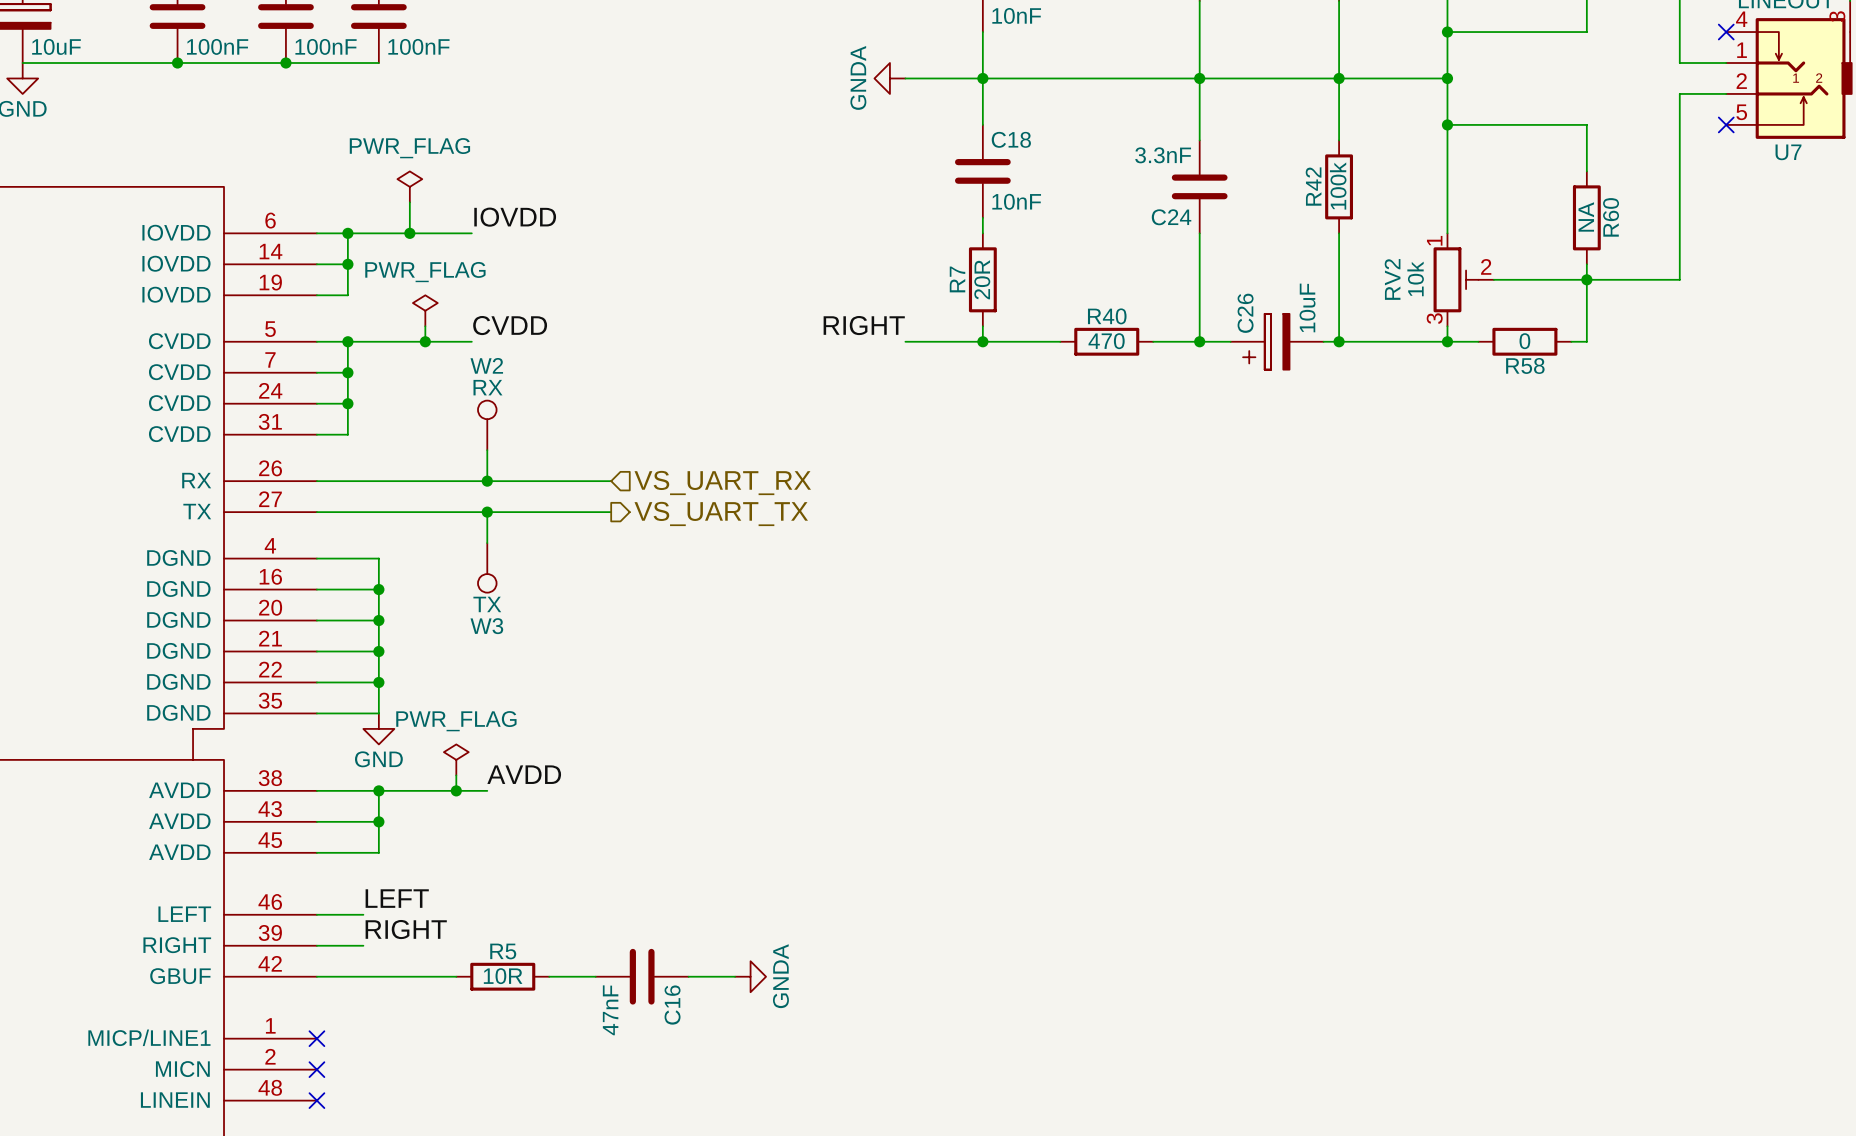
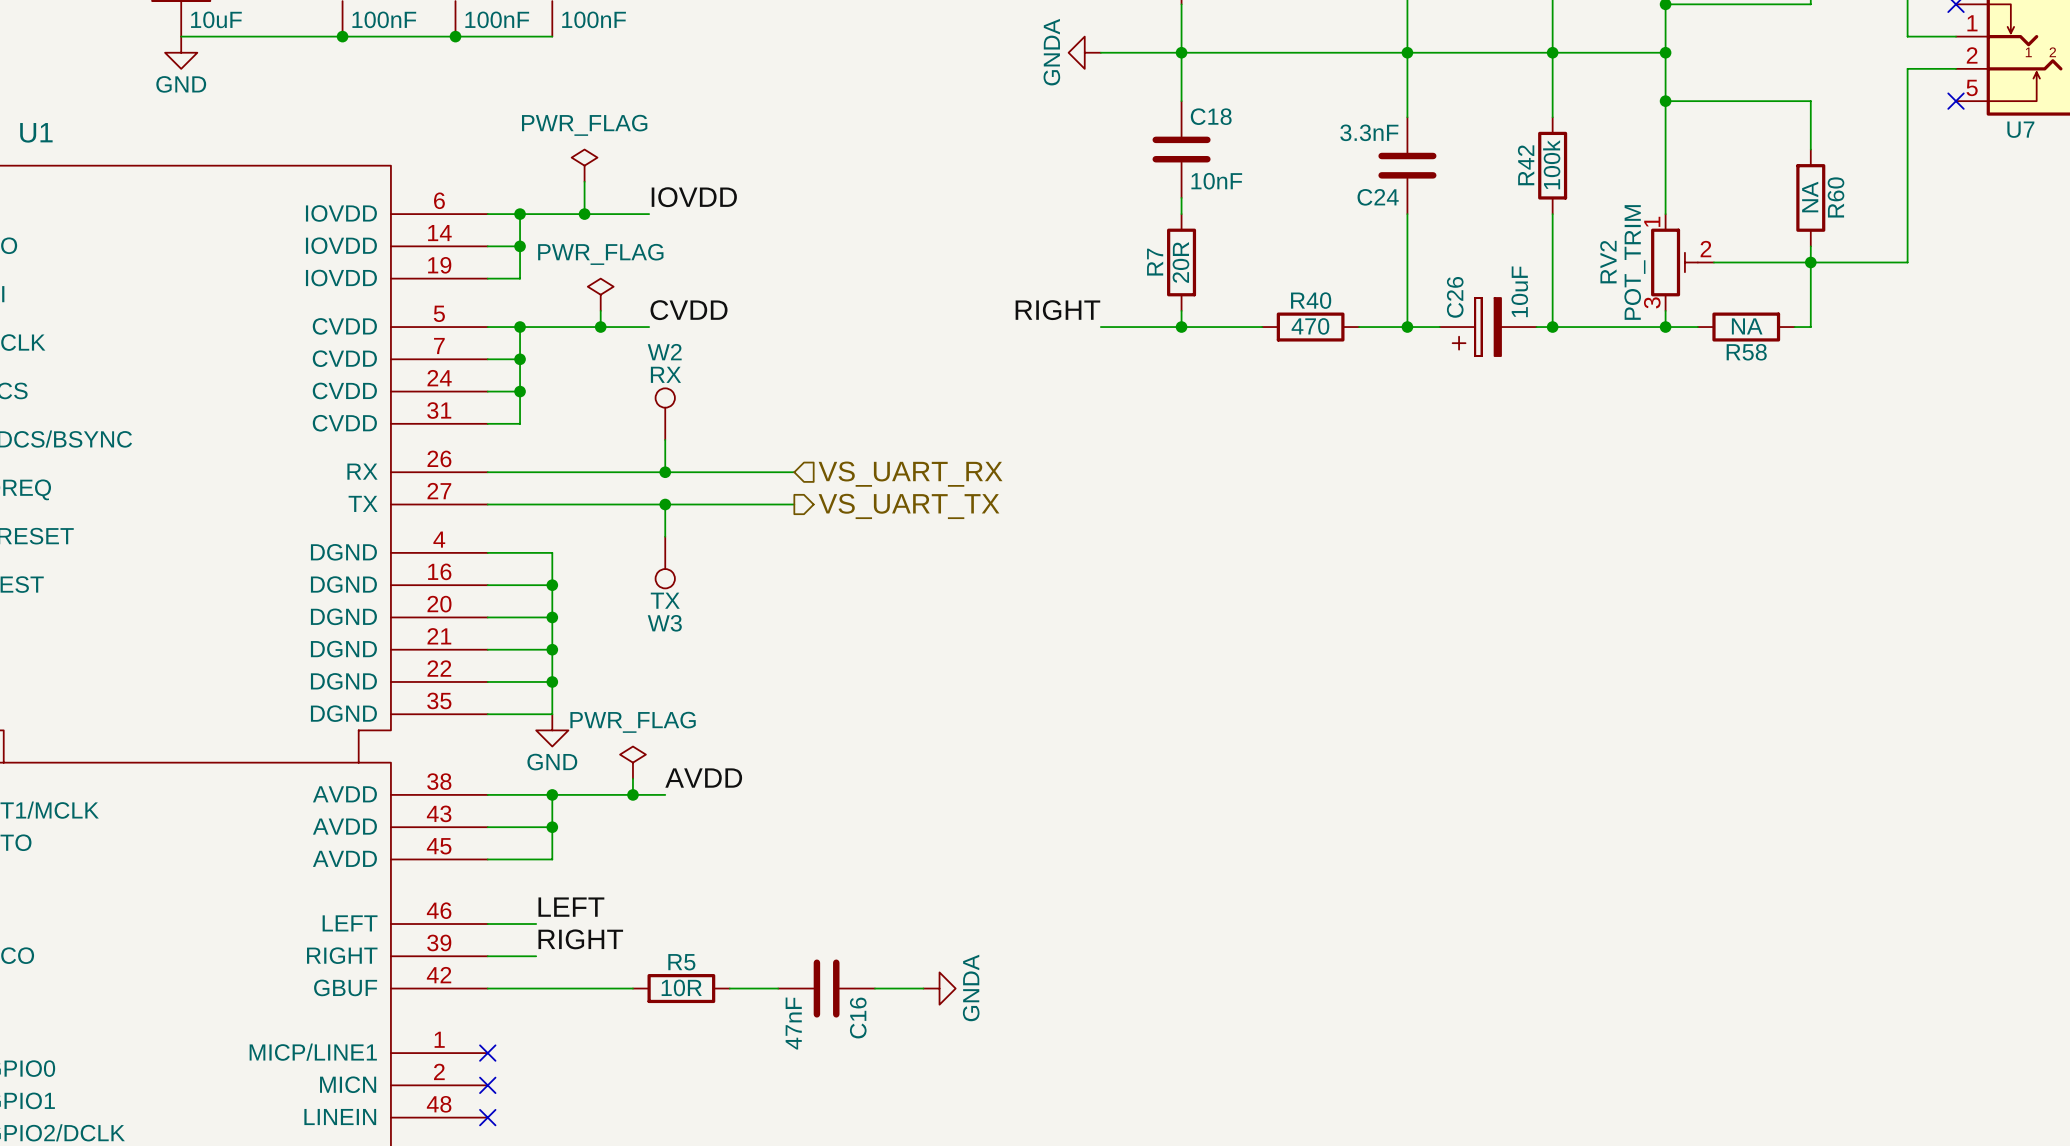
RV2 value: 10k (1415, 278) -> POT_TRIM (1634, 262)
R58 value: 0 (1524, 341) -> NA (1747, 326)

